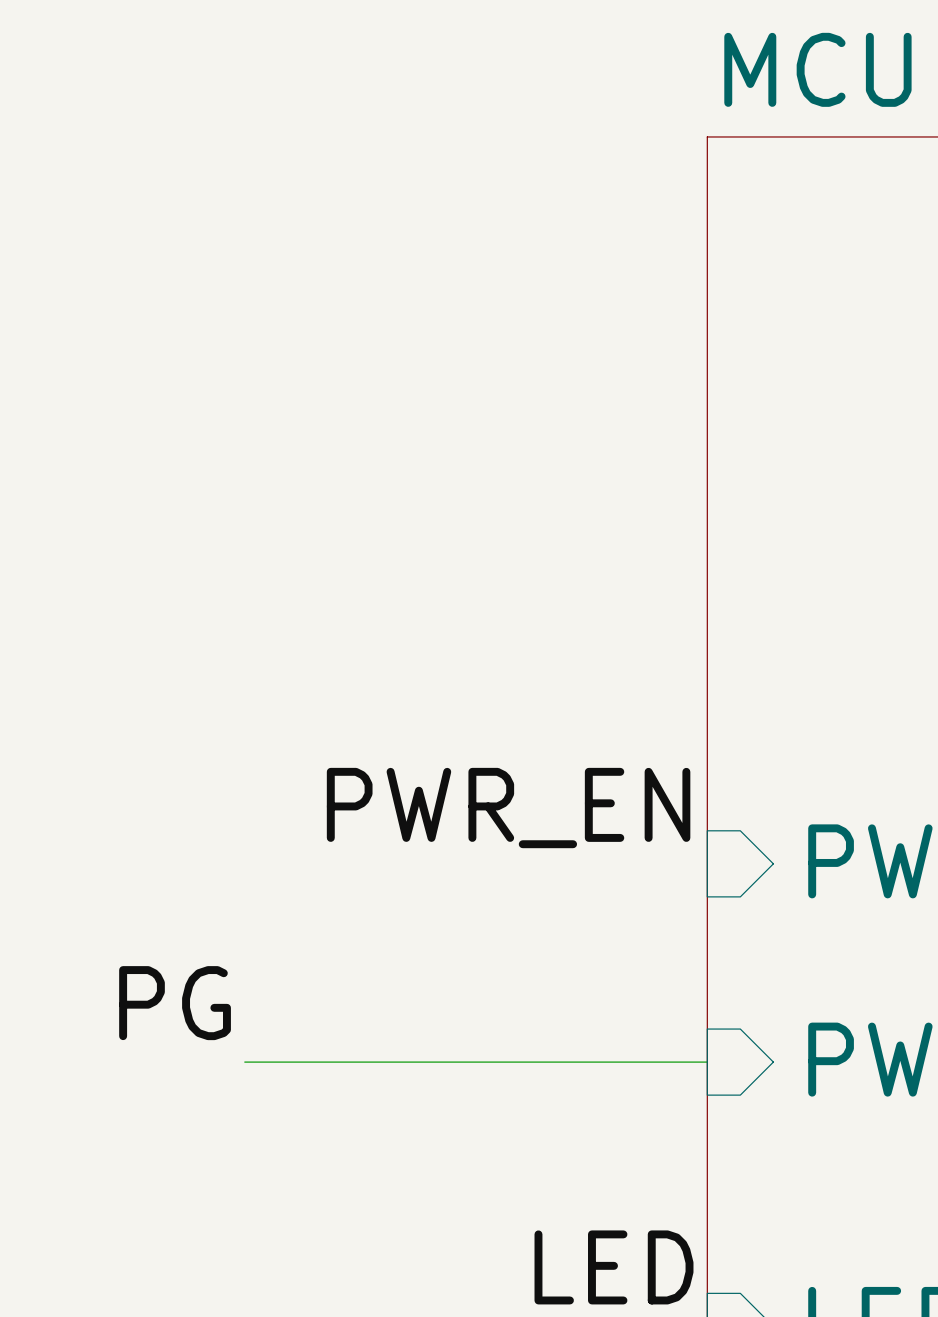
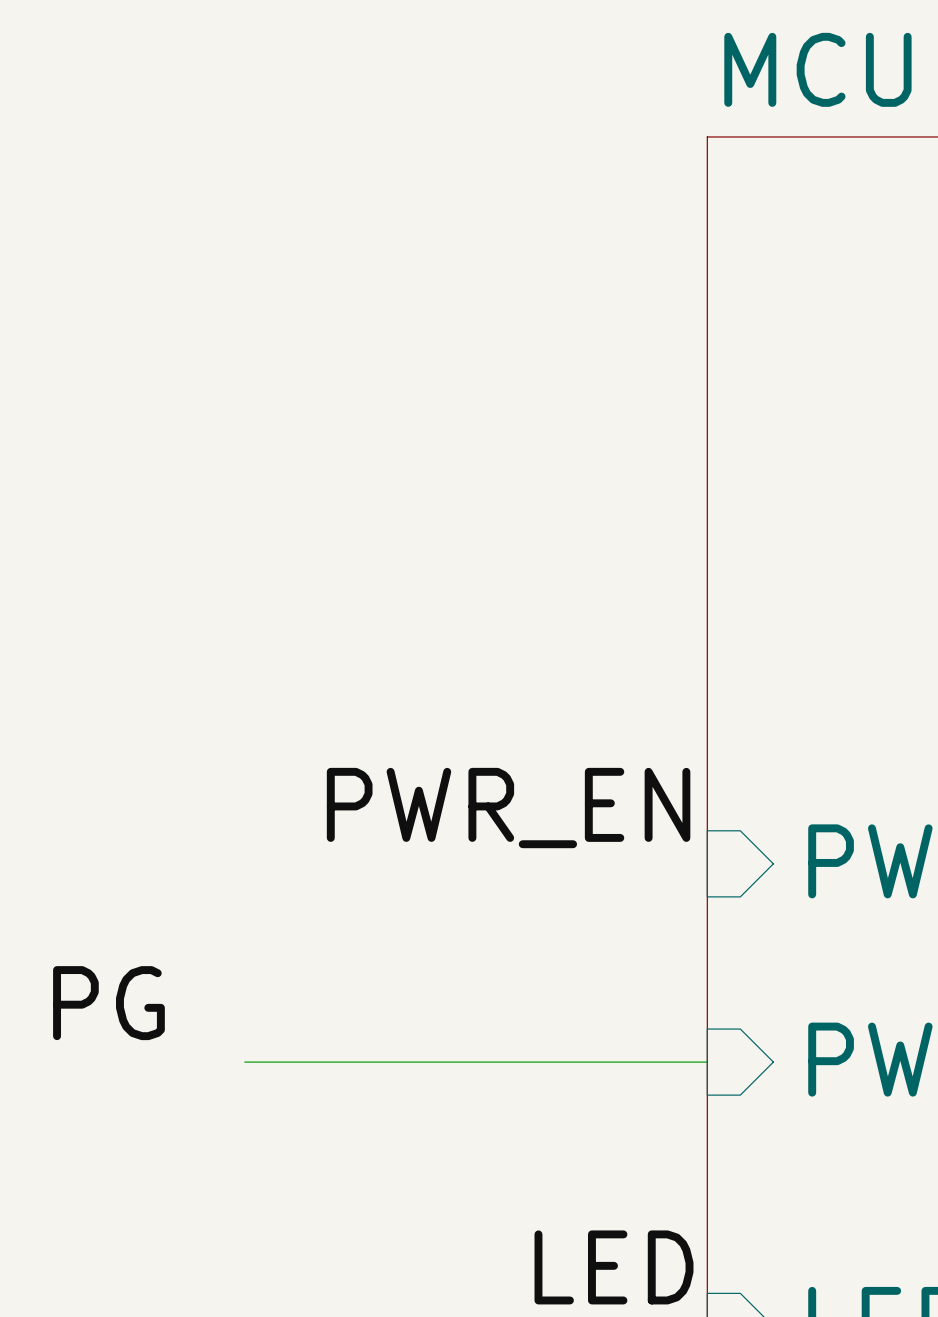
label position: PG (175, 1003) -> PG (108, 1003)

